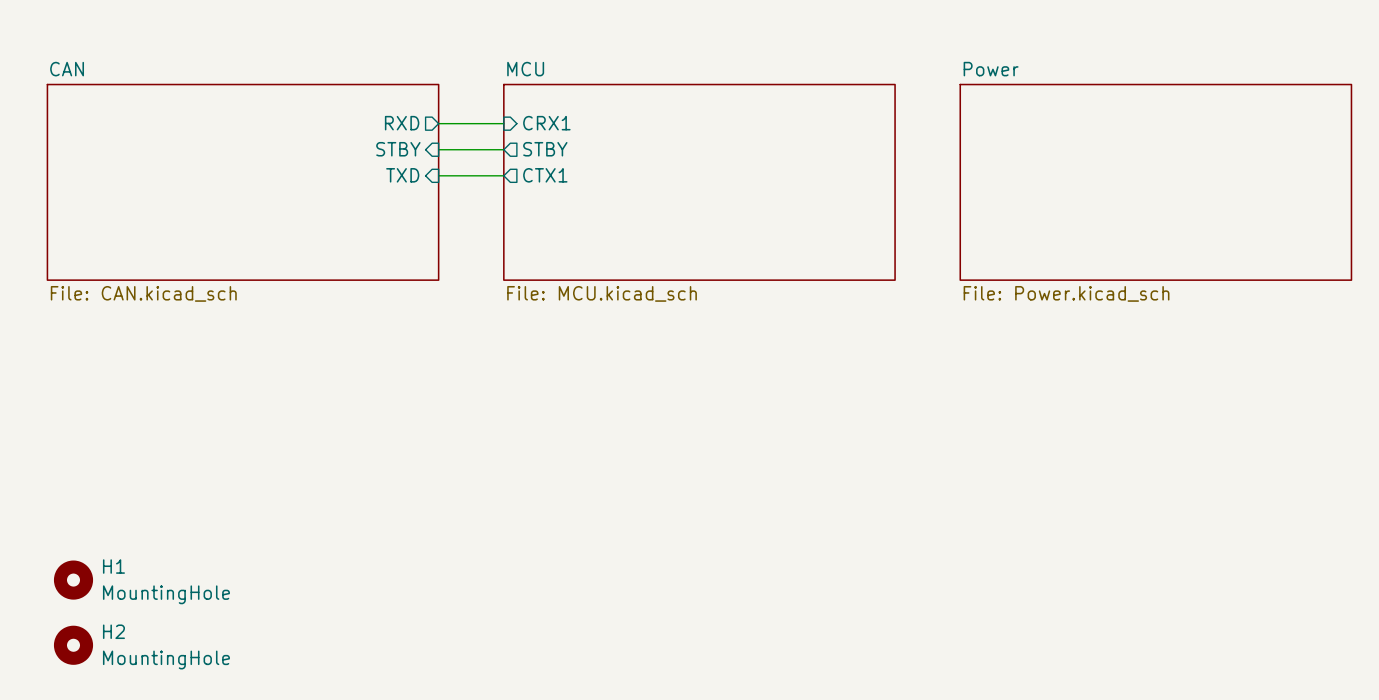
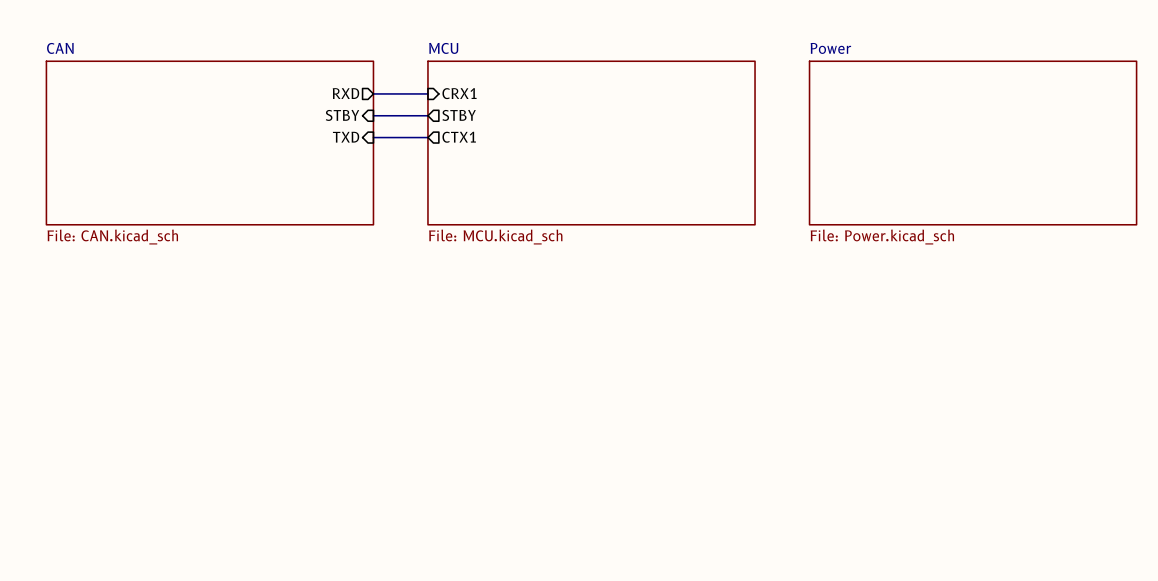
H1: MountingHole (73, 580) -> none
H2: MountingHole (73, 645) -> none

